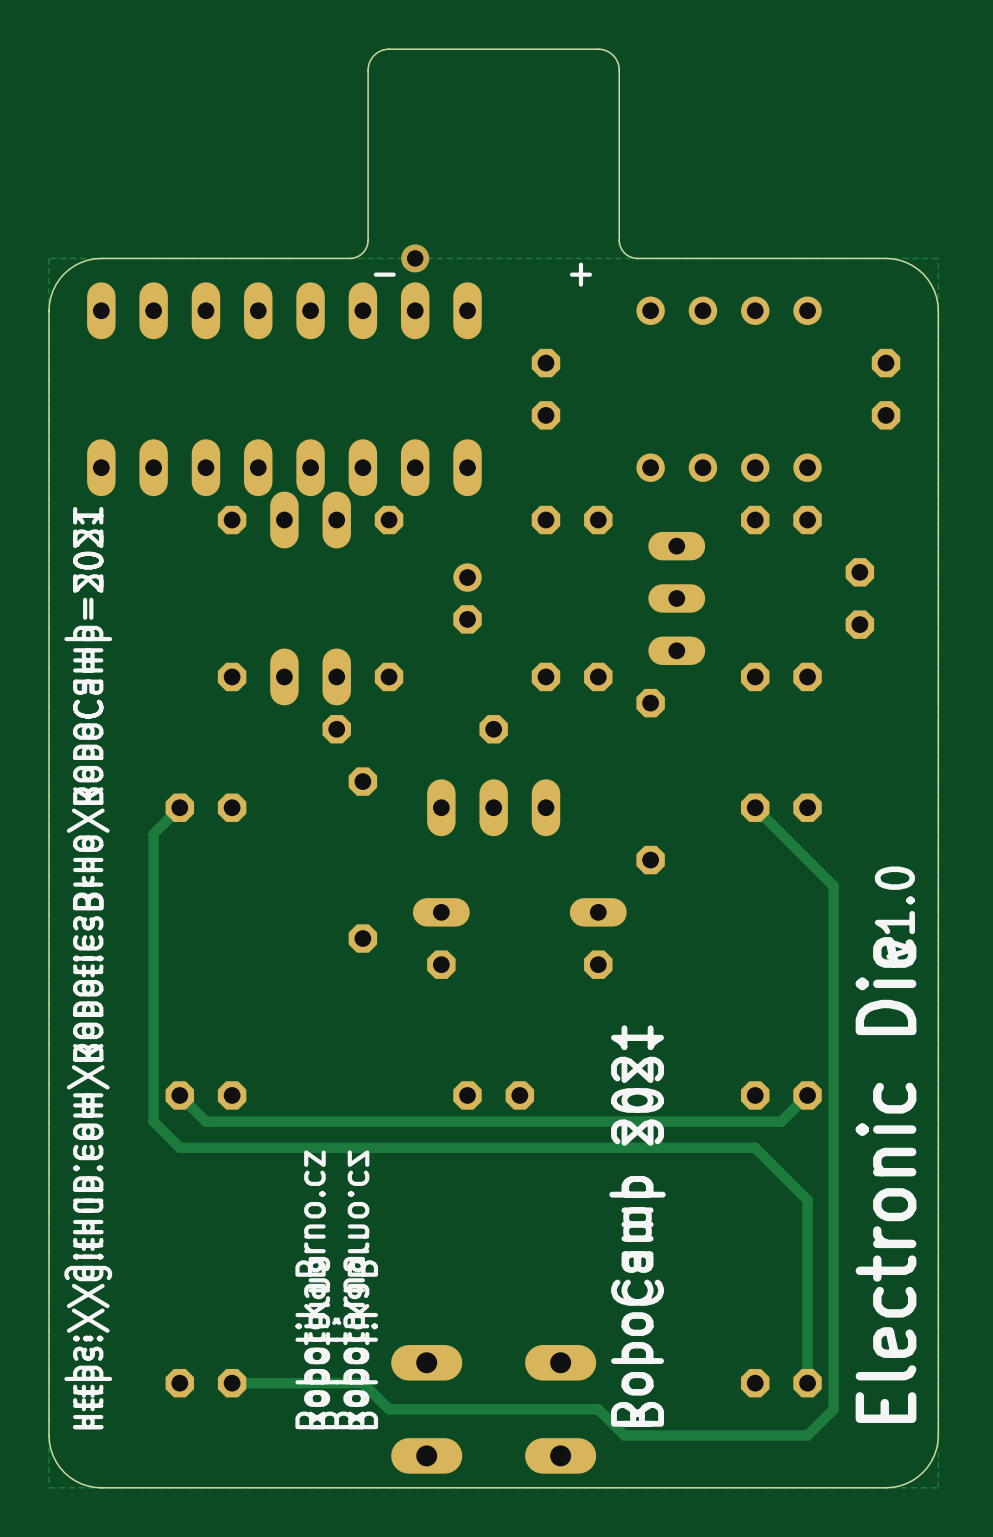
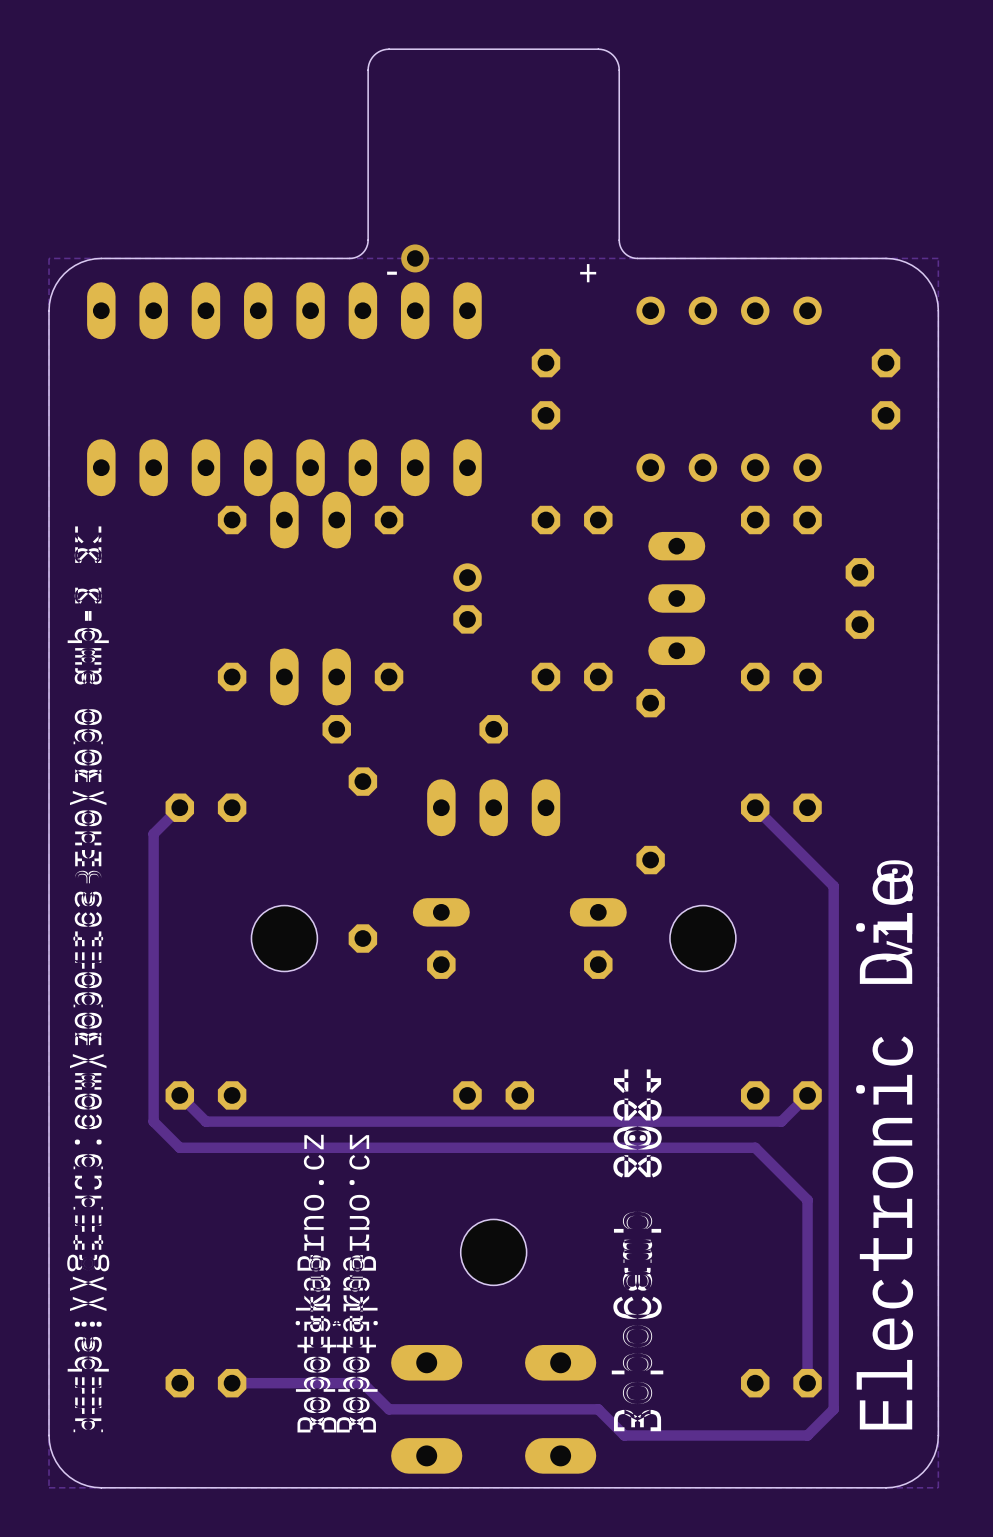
hole: none -> (284, 938)
hole: none -> (702, 938)
hole: none -> (493, 1252)

